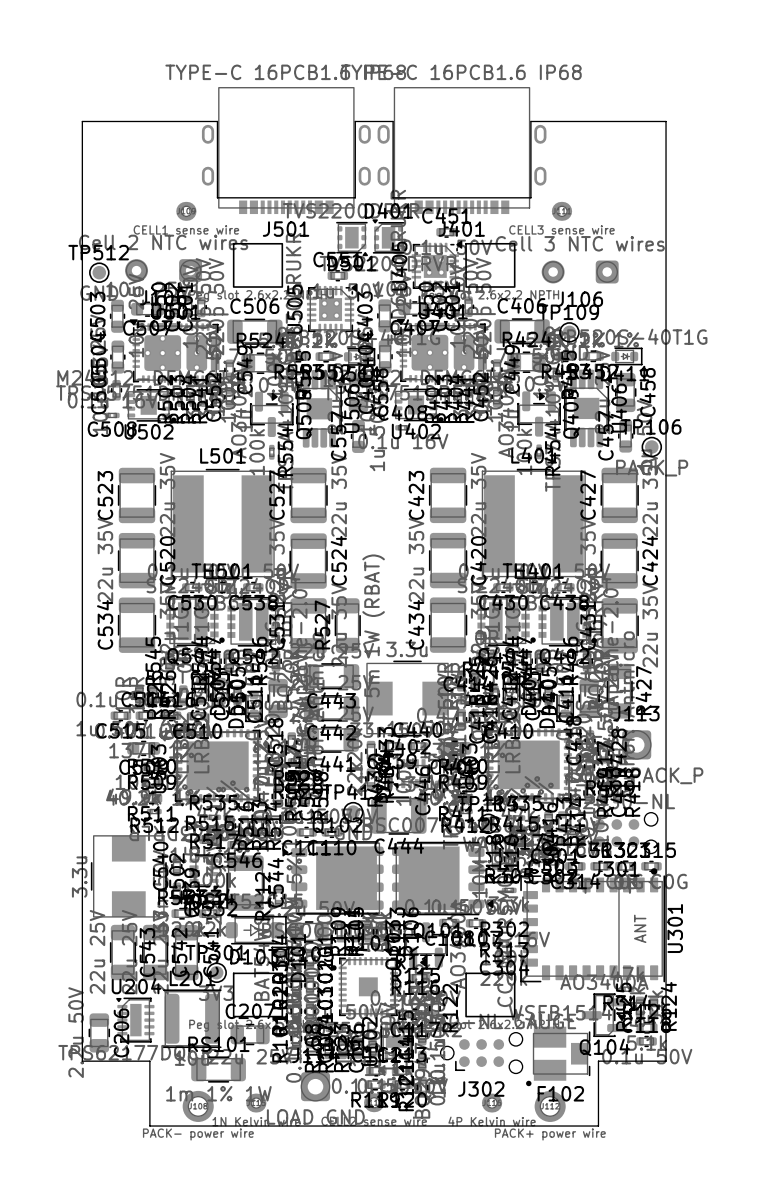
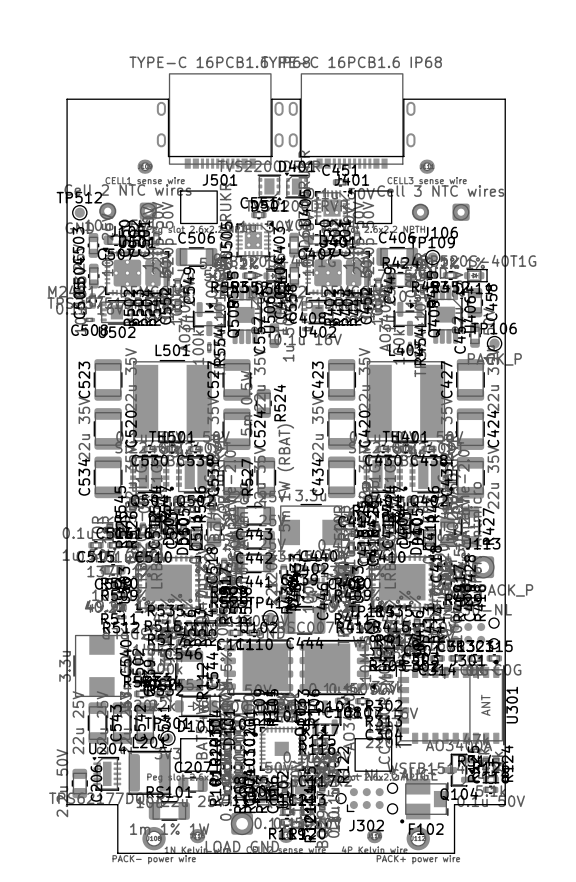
R524 rotation: 0° (260, 363) -> 90° clockwise (263, 403)
R524 position: (260, 363) -> (263, 403)

